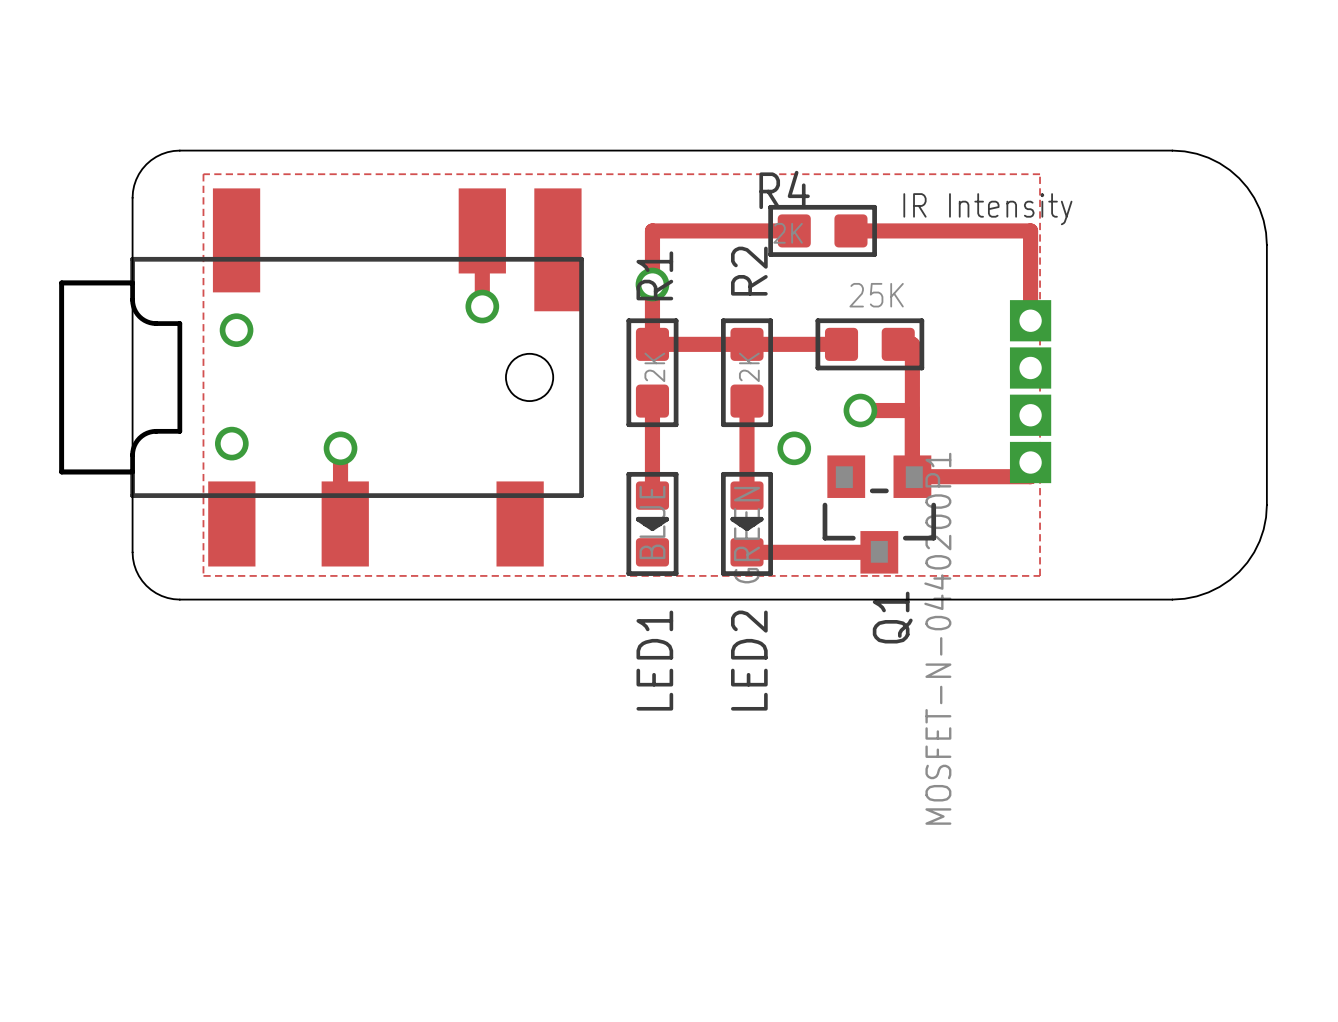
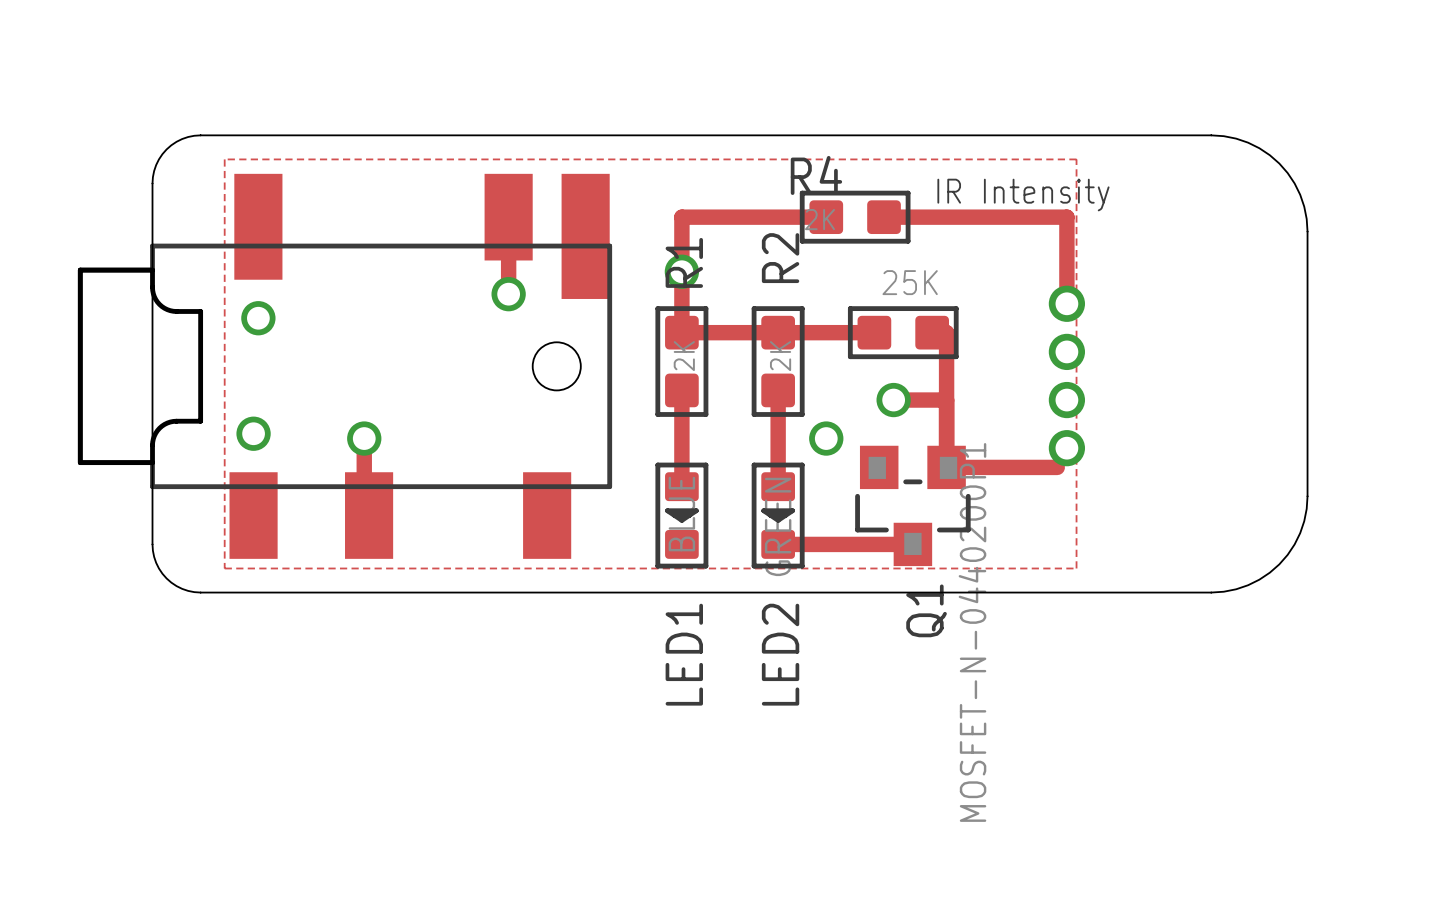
via: none -> (1066, 303)
via: none -> (1066, 351)
part: (1030, 391) -> none
via: none -> (1066, 400)
via: none -> (1066, 448)

